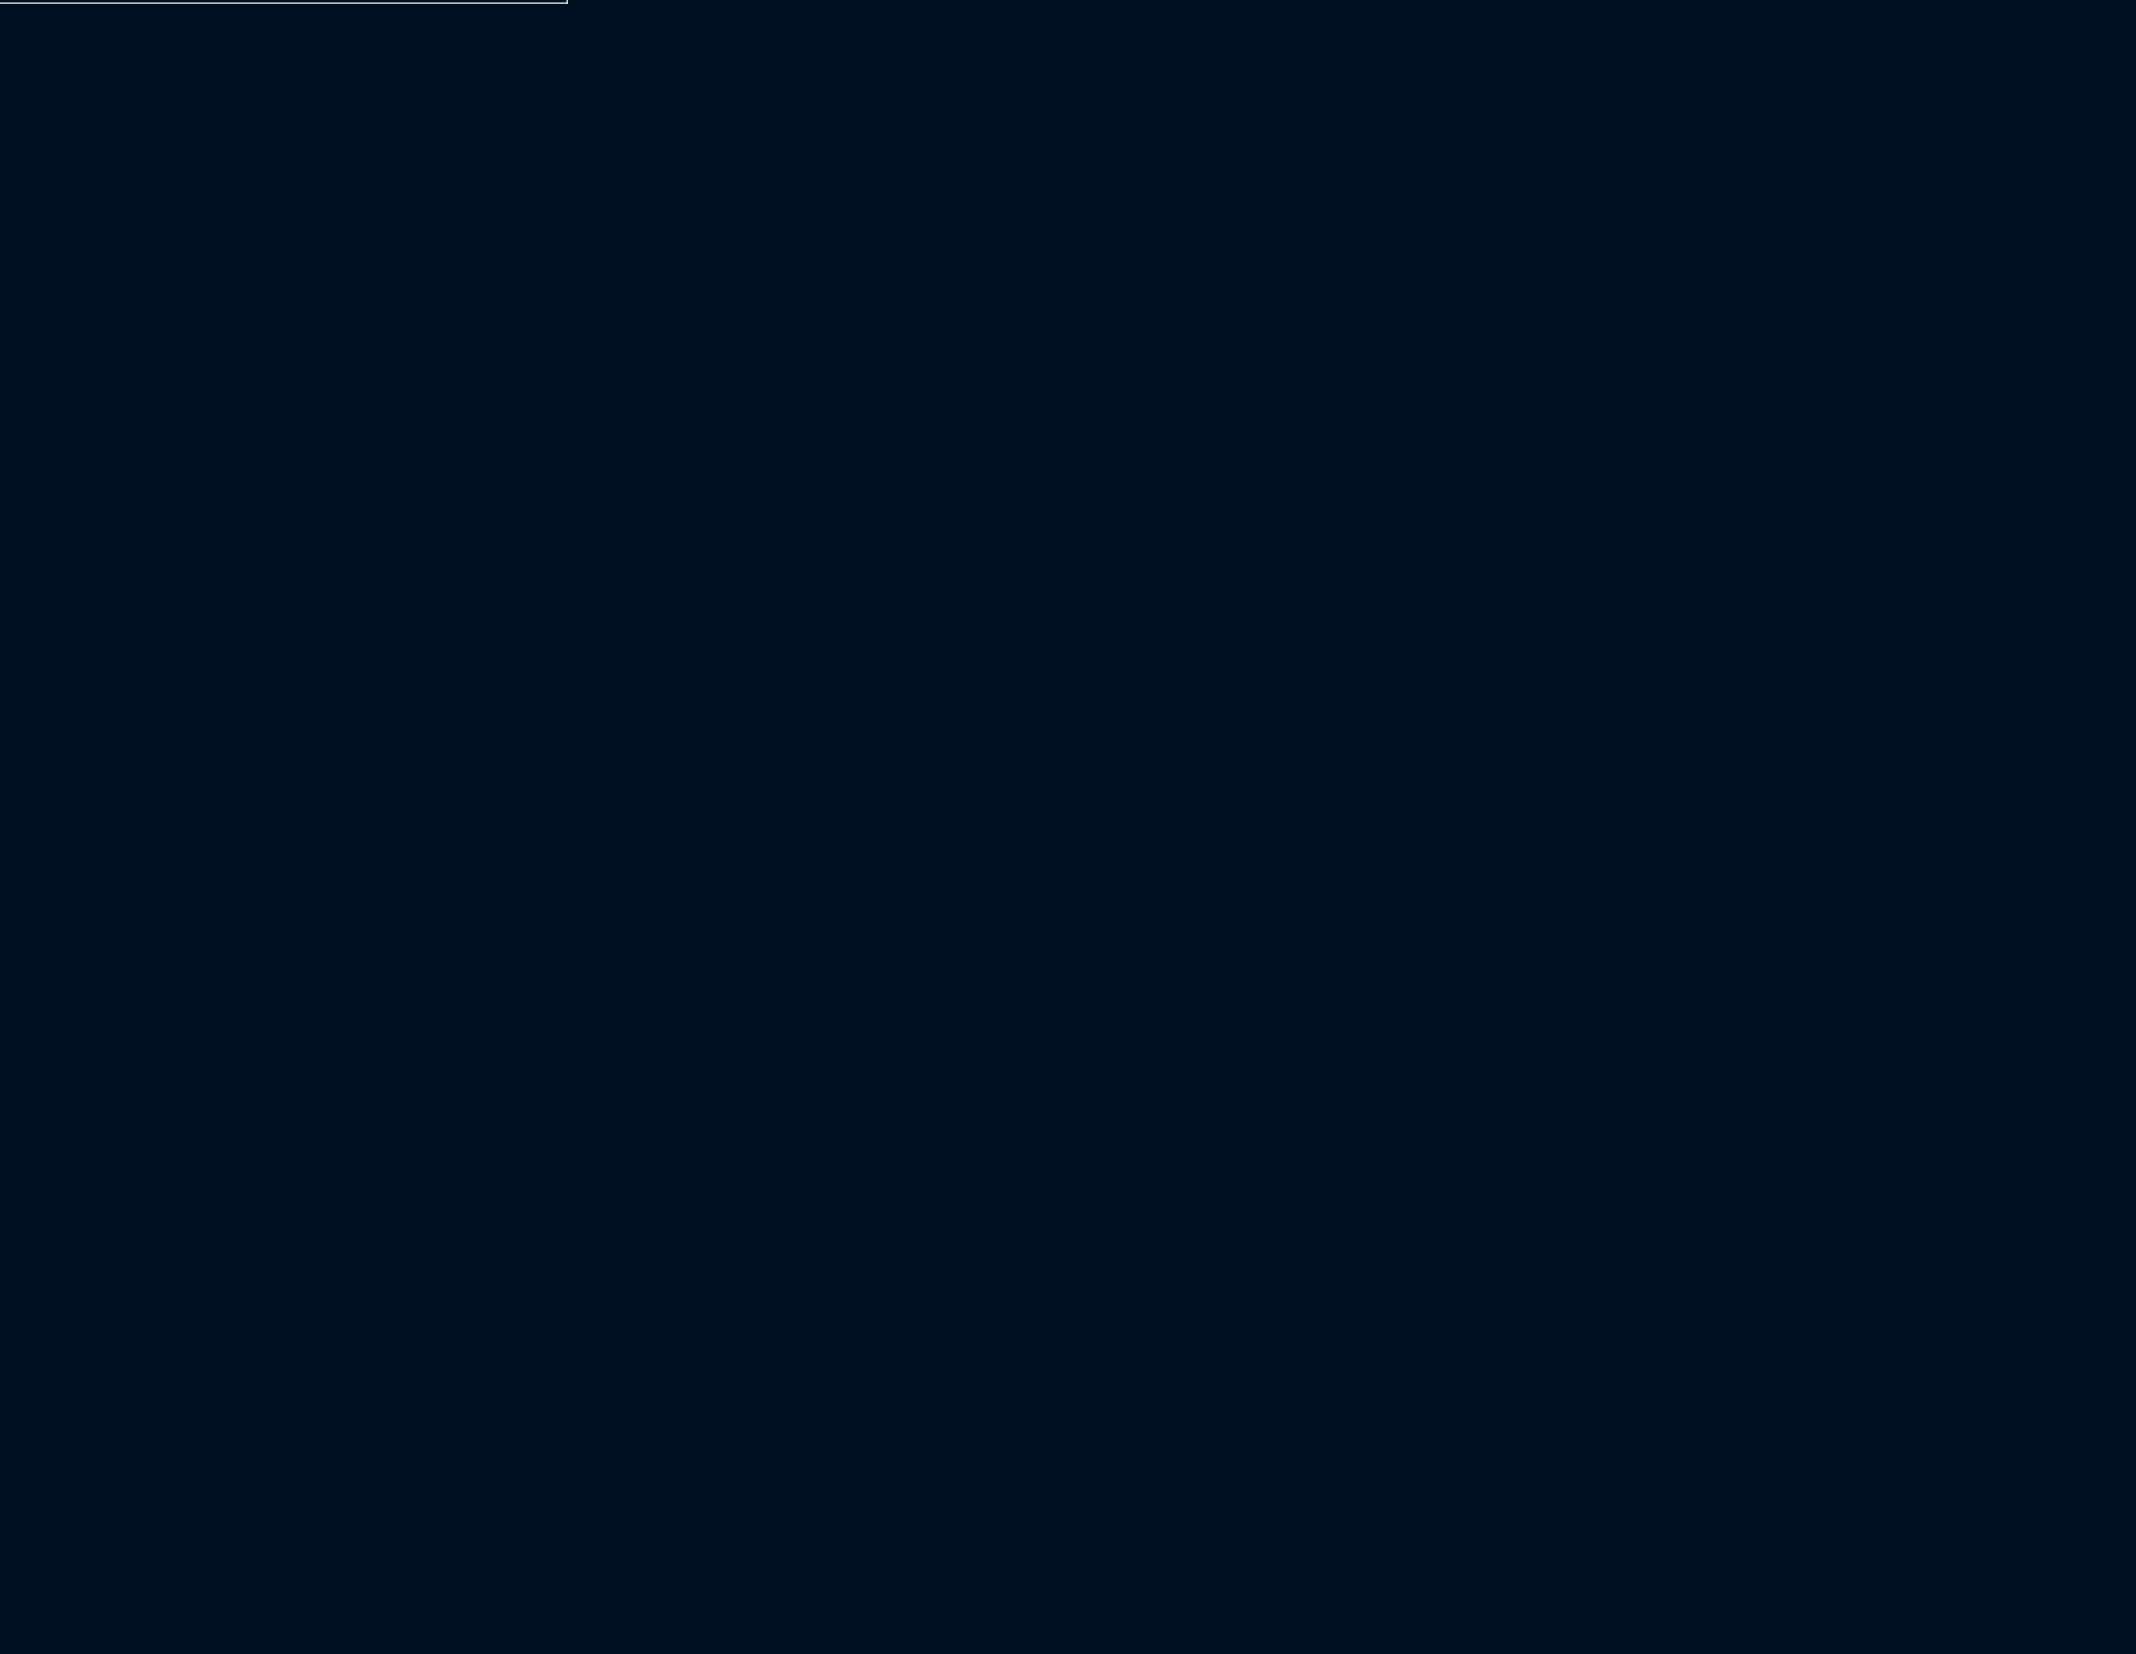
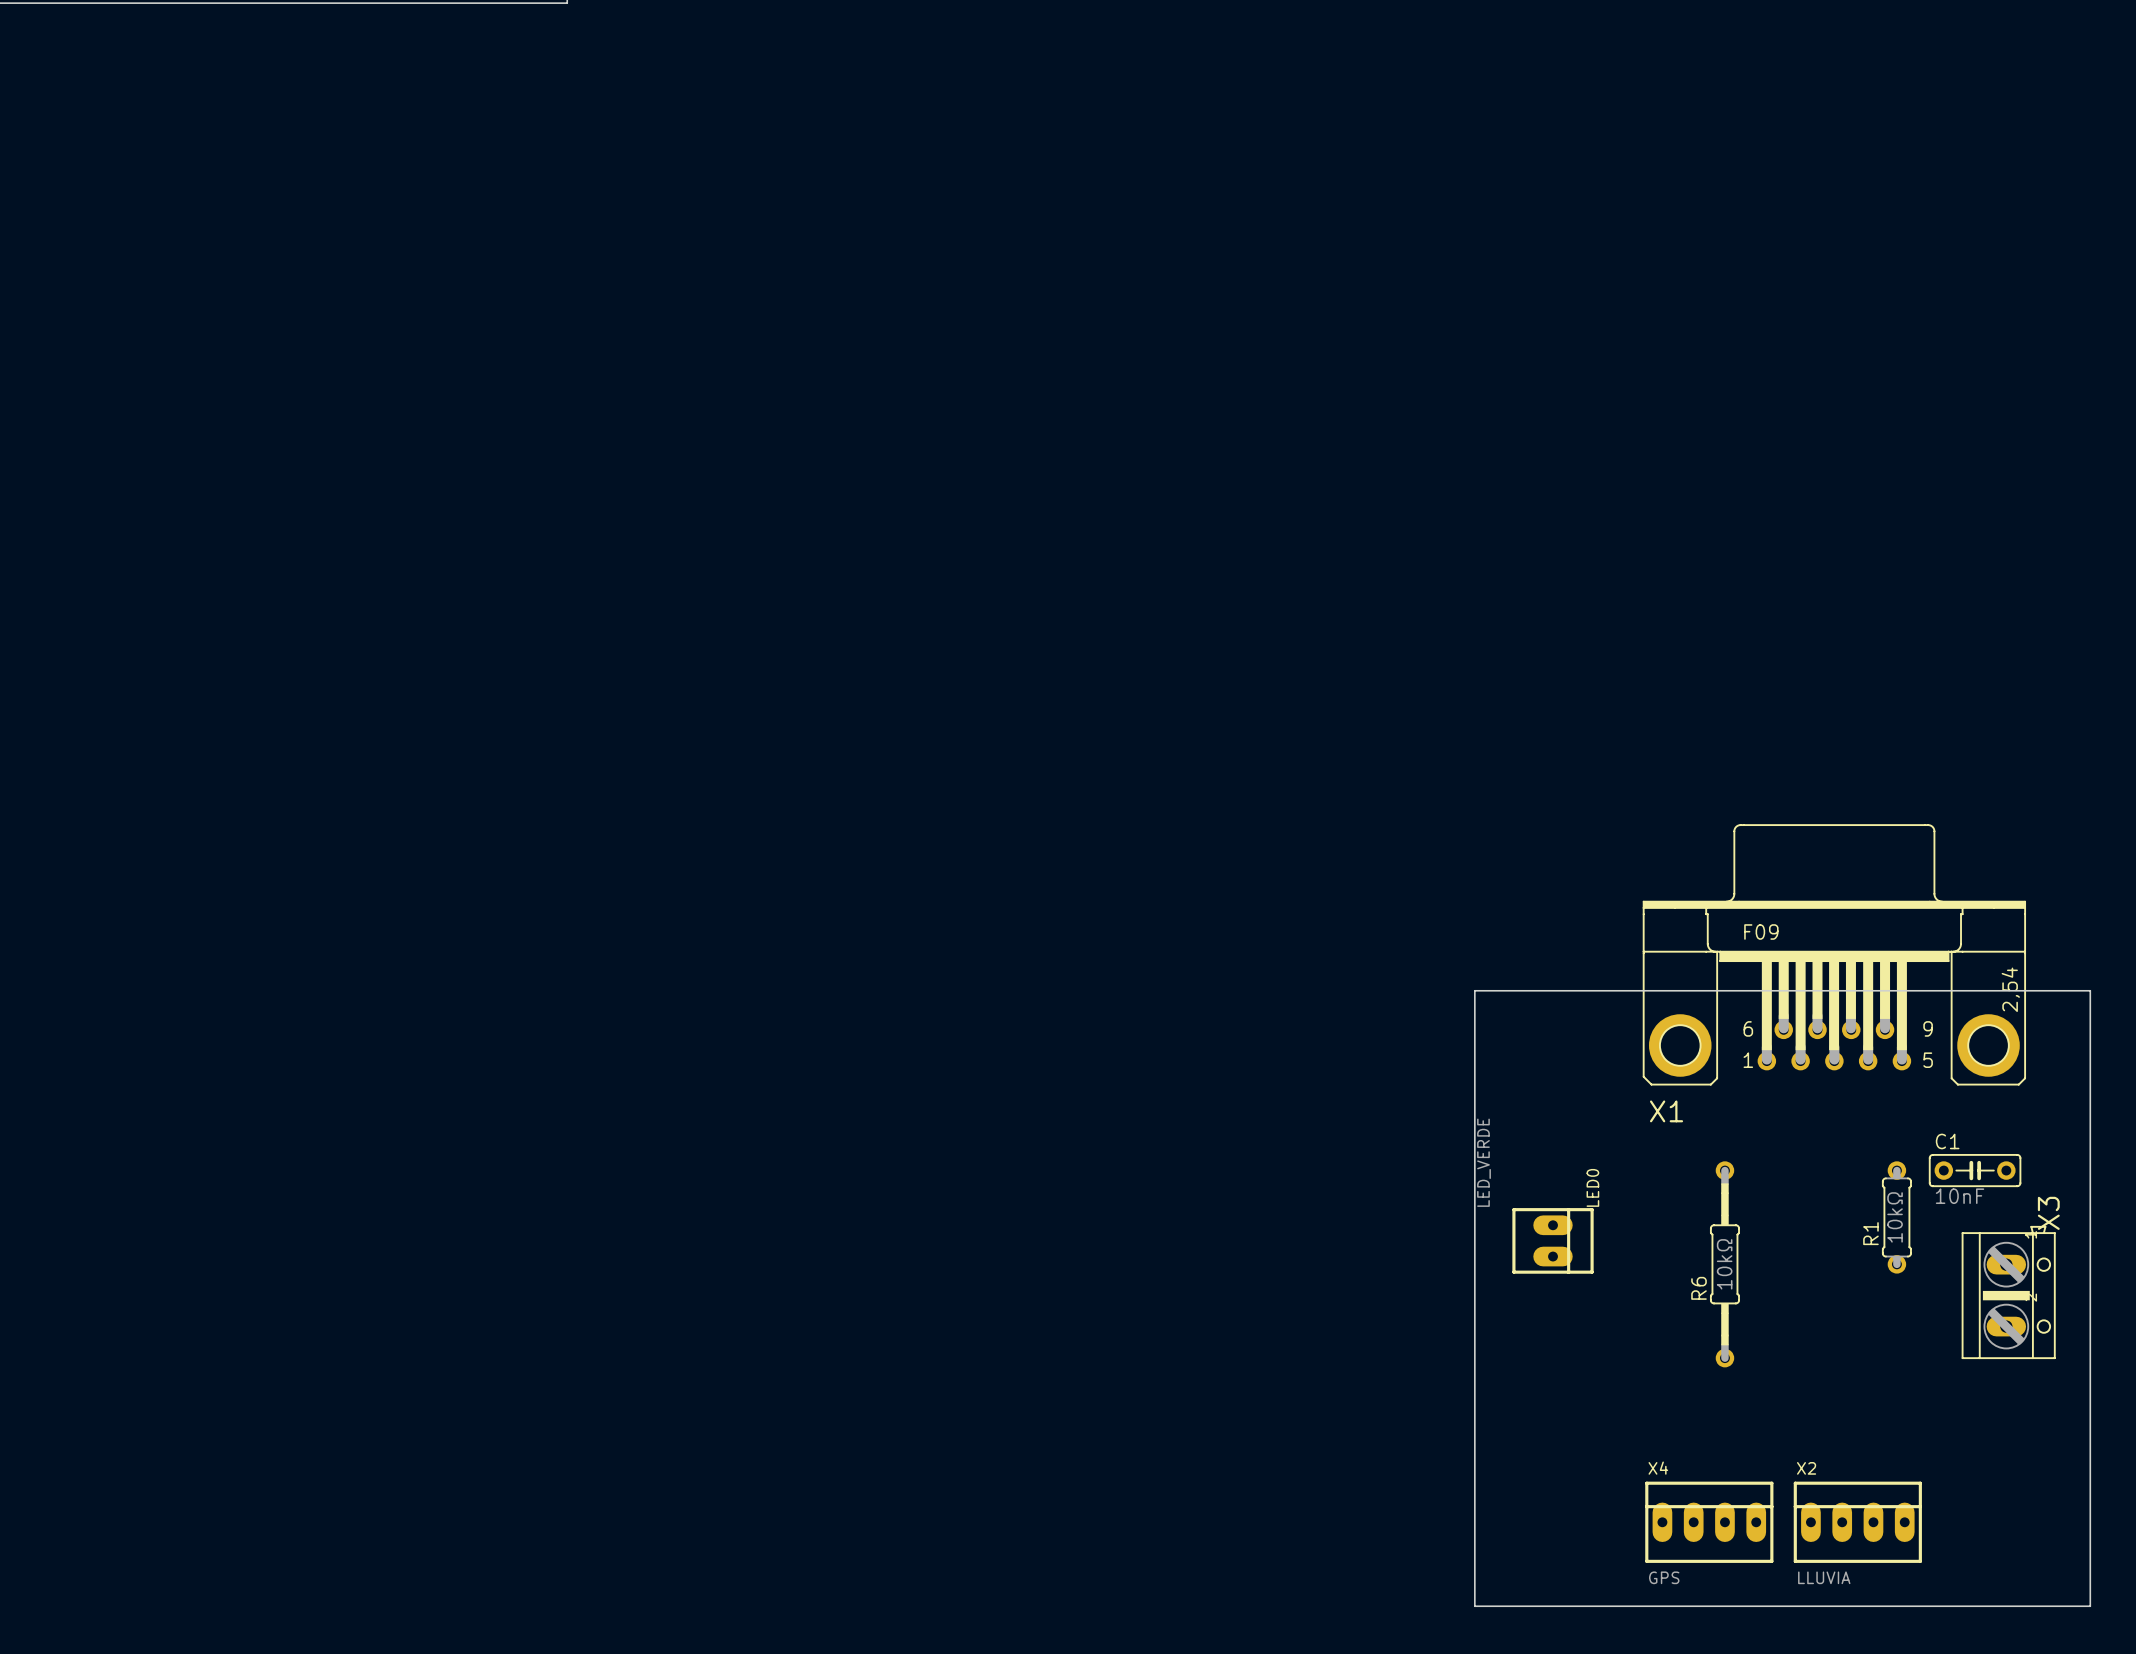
X1: none -> (1834, 954)
board edge: none -> (1474, 990) (1474, 1606) (2090, 1606) (2090, 990) (1474, 990)
C1: none -> 10nF (1975, 1170)
R1: none -> 10kΩ (1896, 1217)
LED0: none -> LED_VERDE (1553, 1240)
R6: none -> 10kΩ (1724, 1264)
X3: none -> (2008, 1292)
X4: none -> GPS (1709, 1522)
X2: none -> LLUVIA (1857, 1522)

